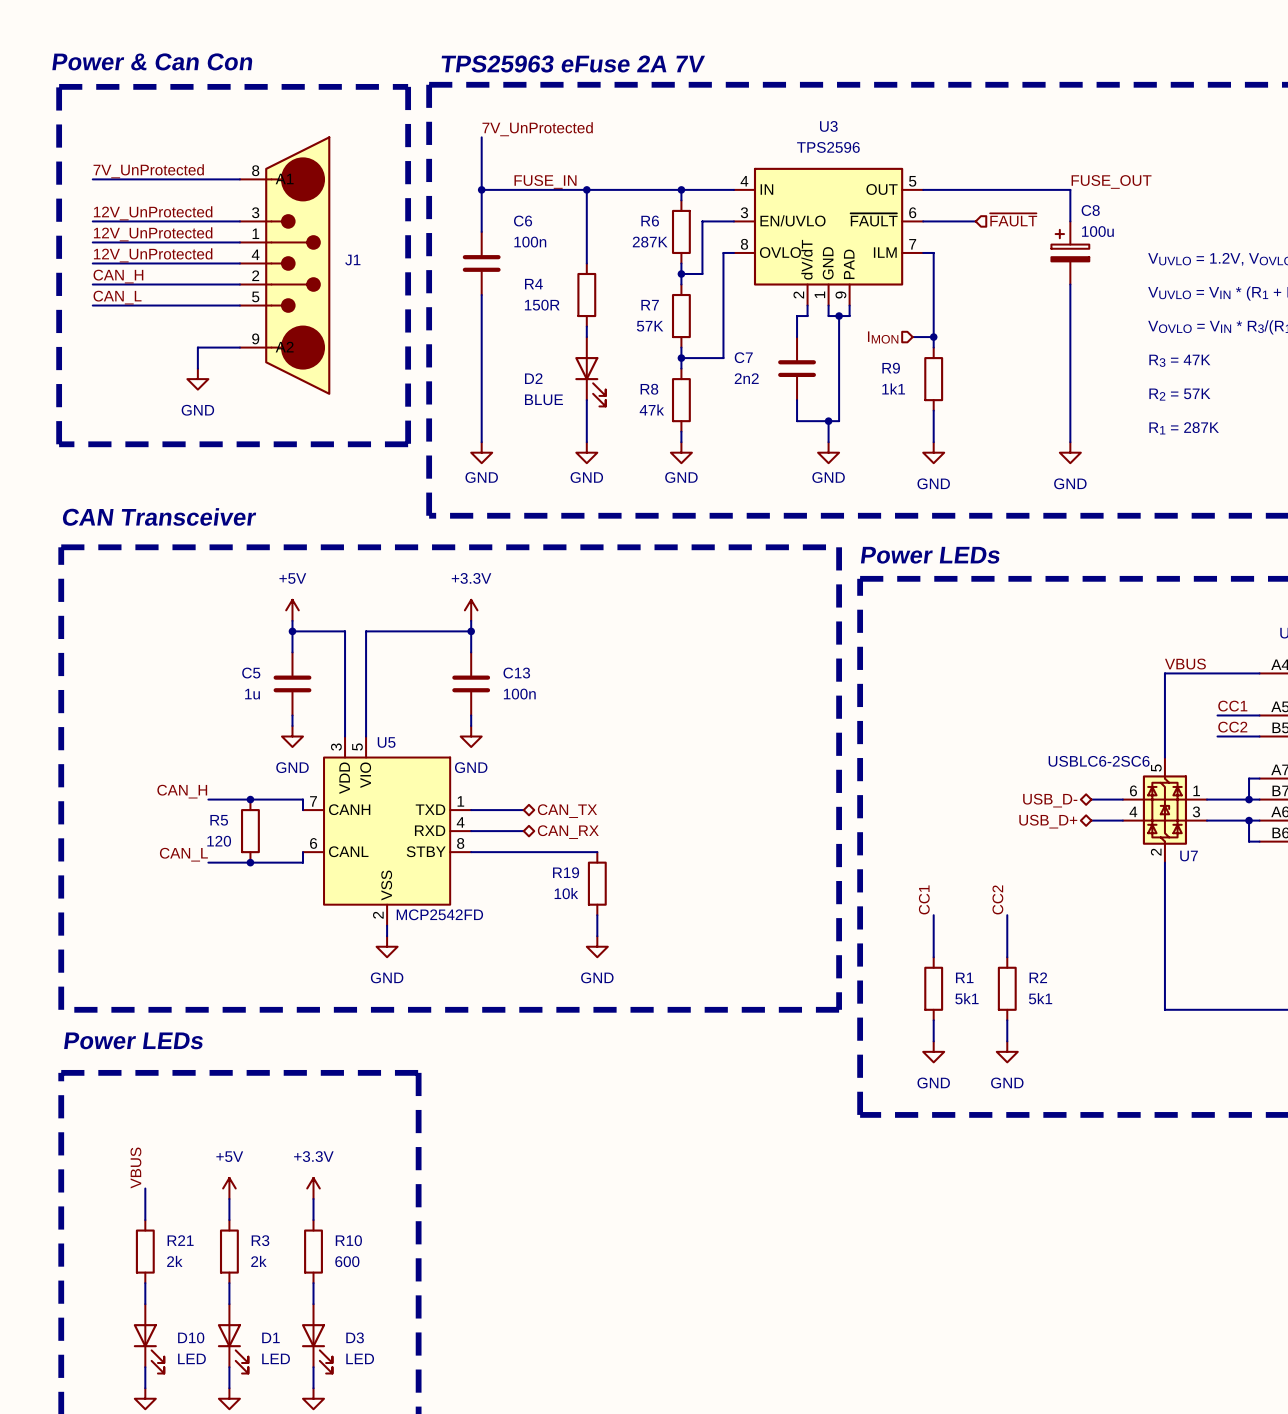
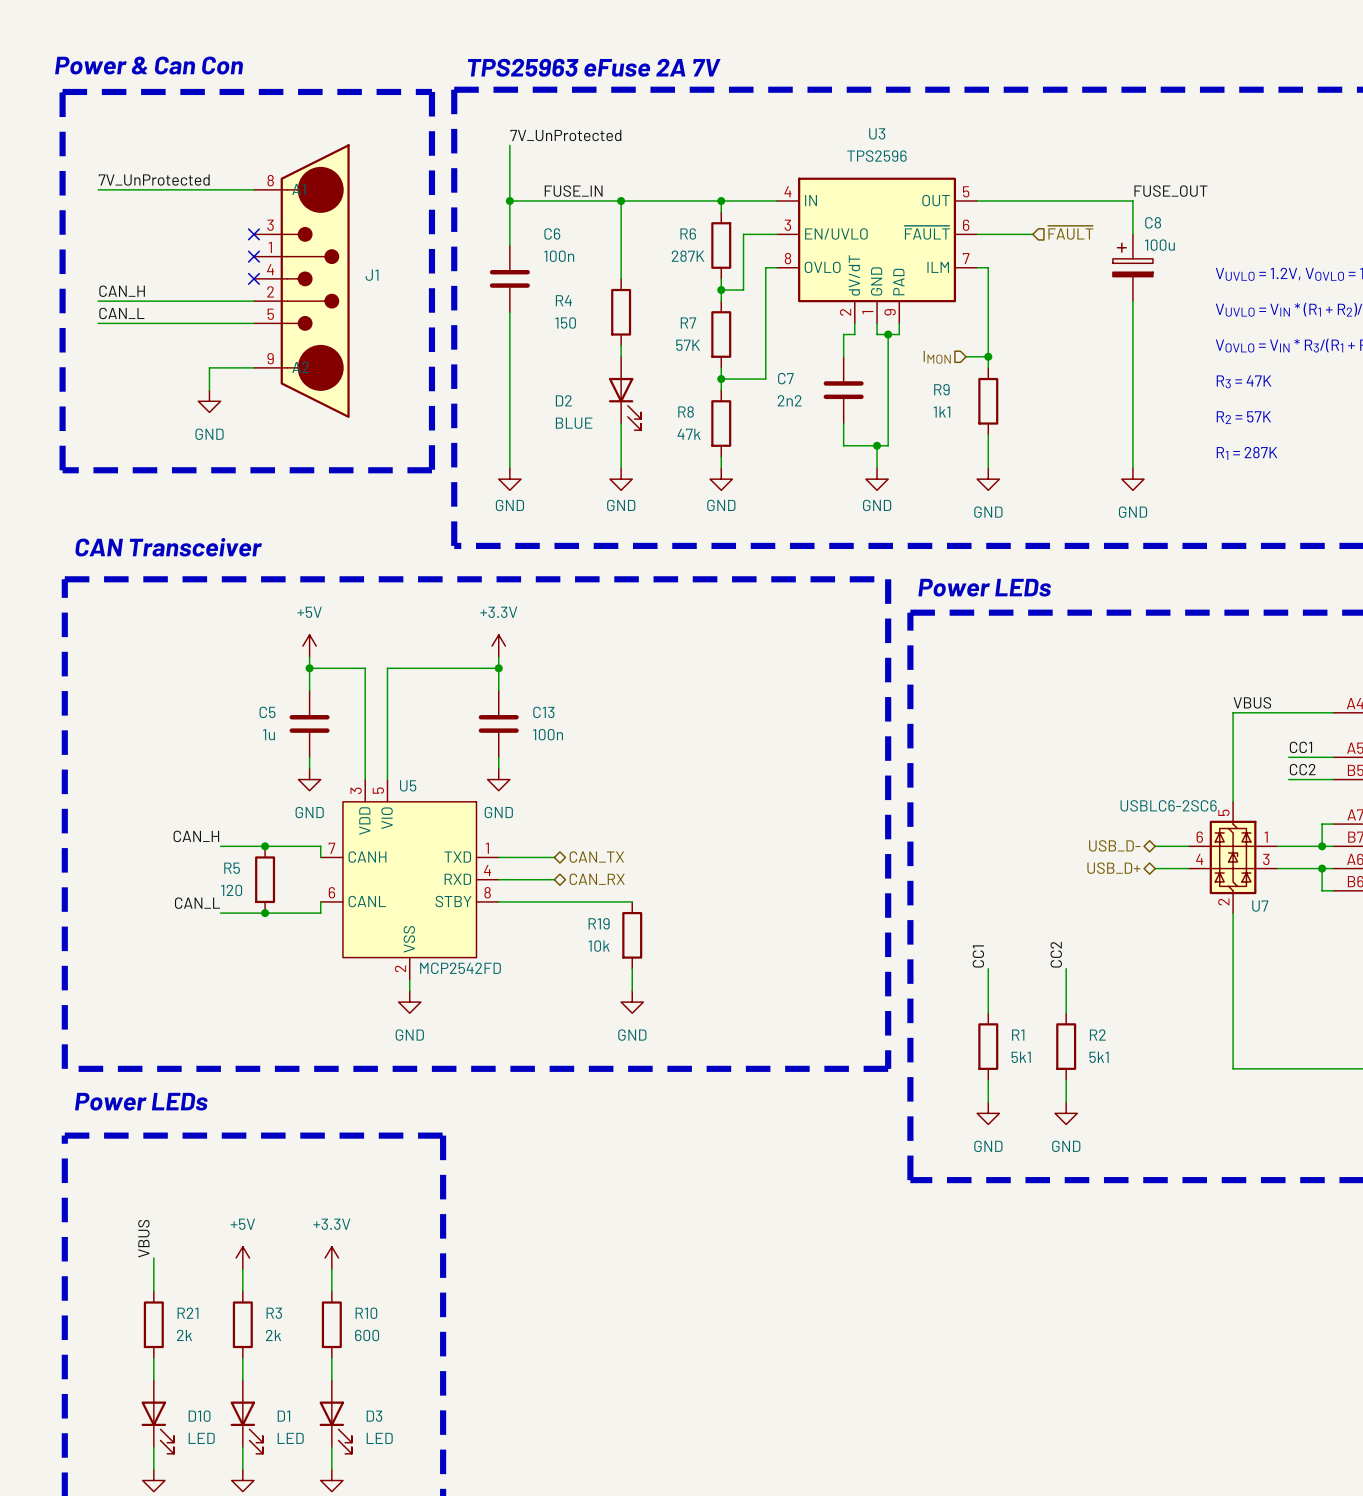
label: 12V_UnProtected (153, 213) -> none
wire: (92, 221) (239, 221) -> none
no-connect mark: none -> (253, 234)
label: 12V_UnProtected (153, 234) -> none
wire: (92, 242) (239, 242) -> none
no-connect mark: none -> (253, 256)
label: 12V_UnProtected (153, 255) -> none
wire: (92, 263) (239, 263) -> none
no-connect mark: none -> (253, 278)
R4 value: 150R (542, 305) -> 150 (565, 322)

